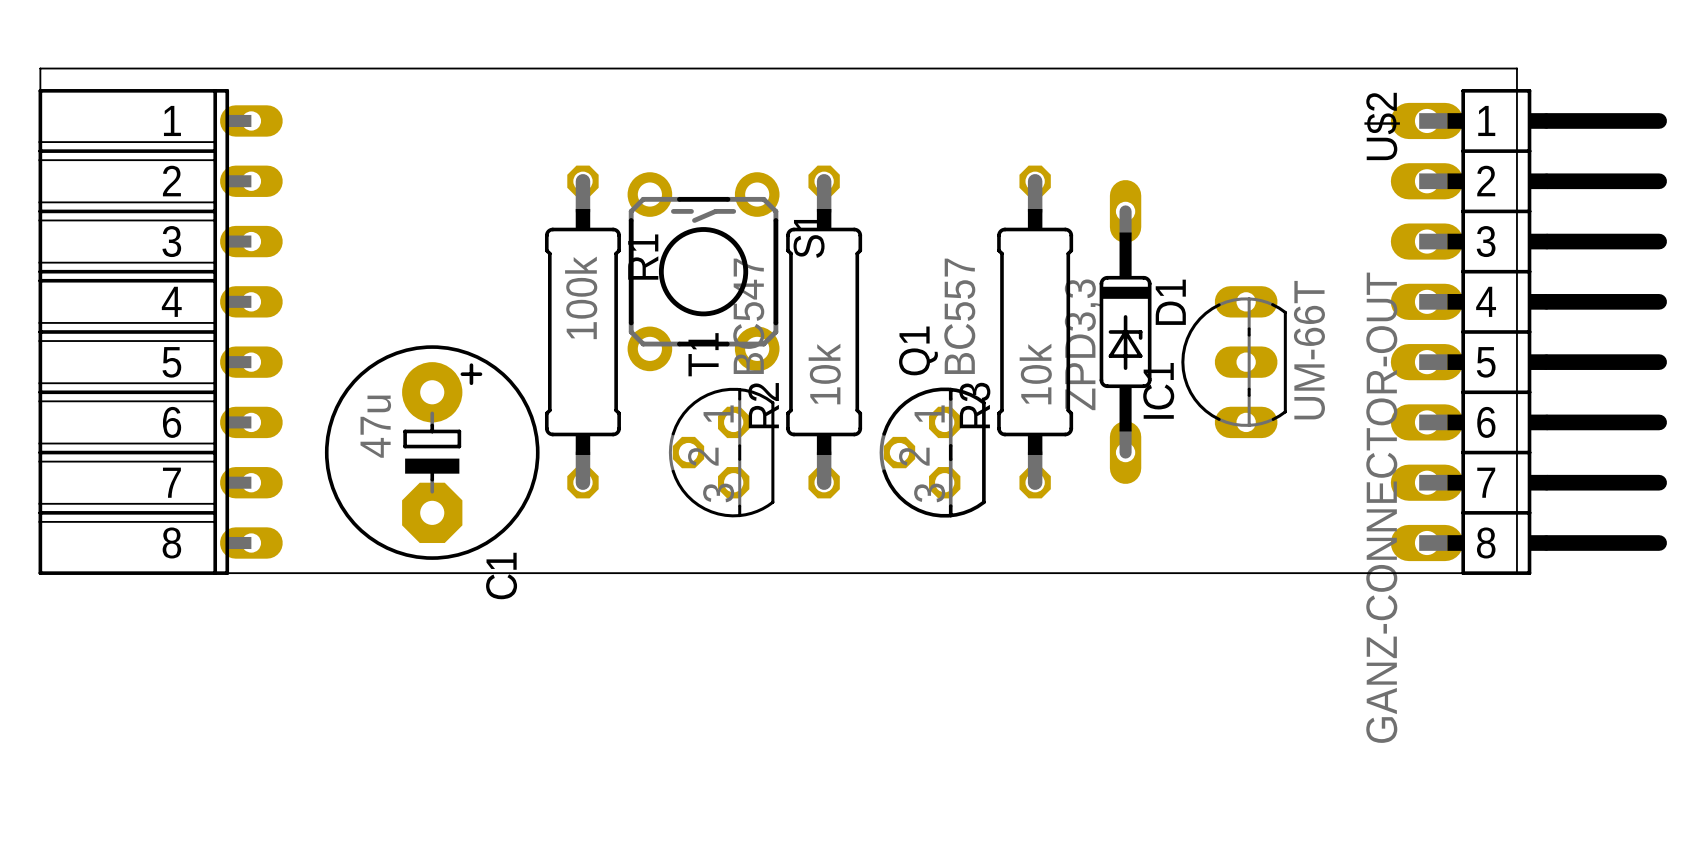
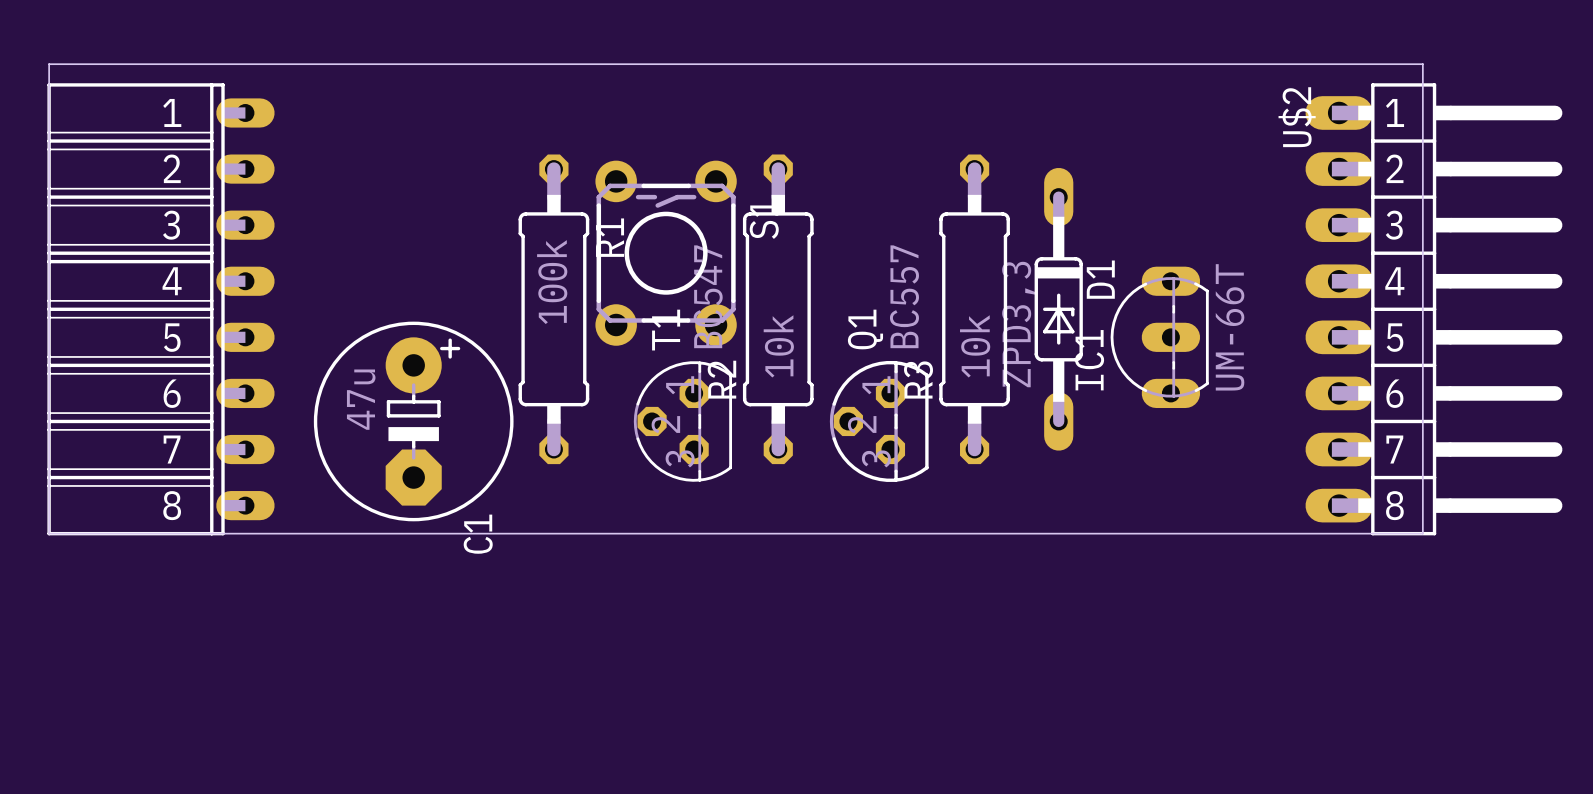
U$2 value: GANZ-CONNECTOR-OUT (1381, 507) -> none

